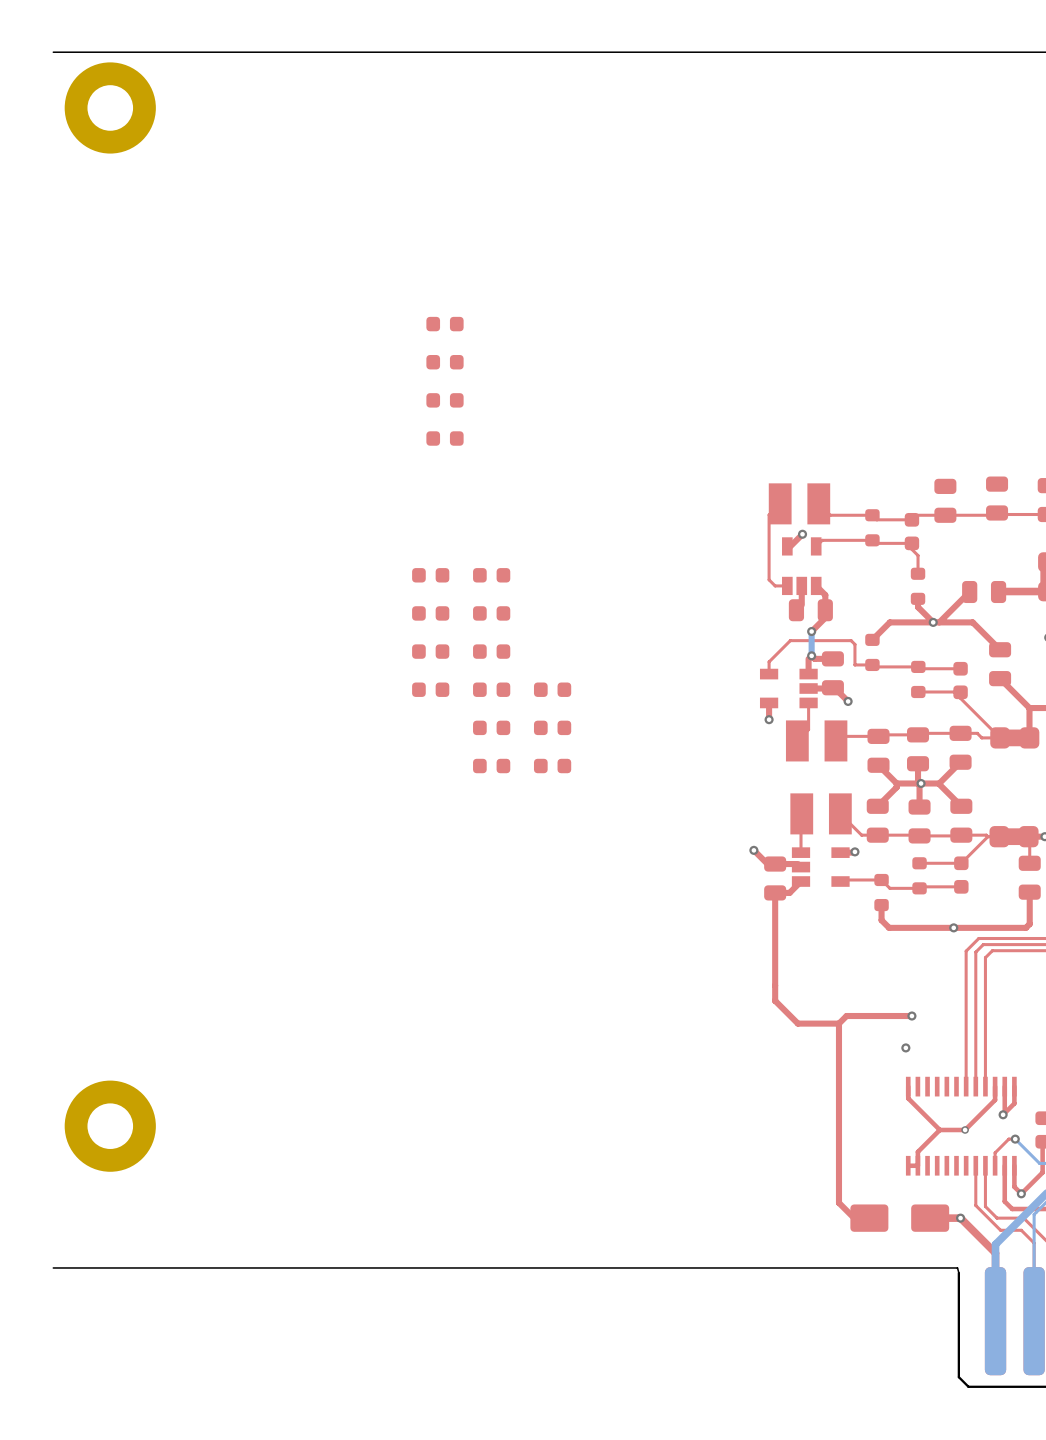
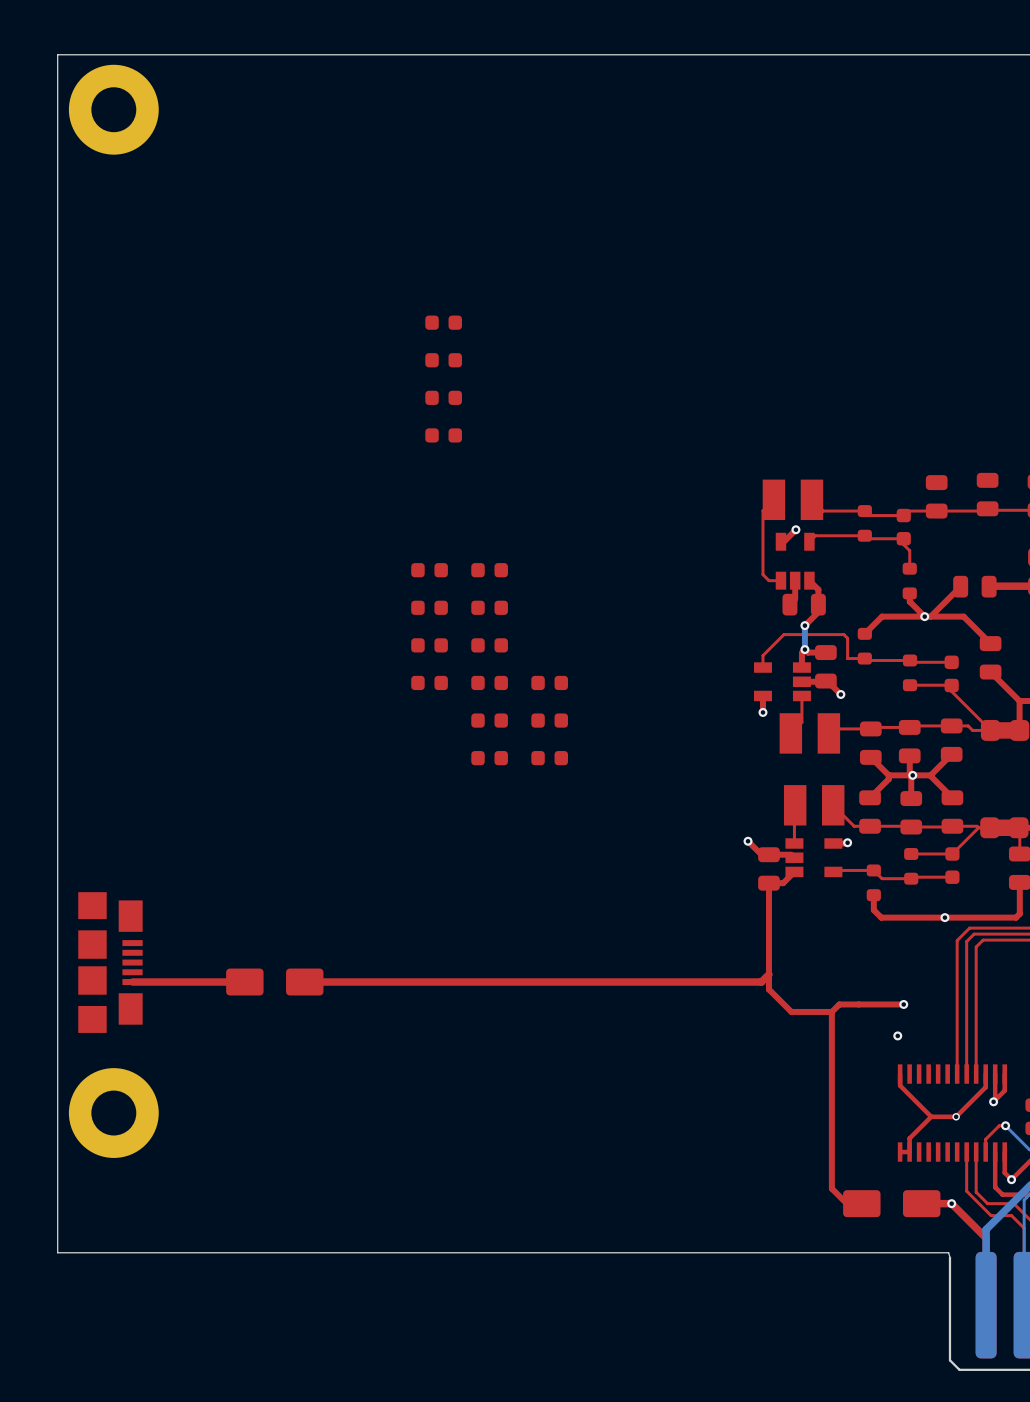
board edge: none -> (57, 54) (57, 1252)
part: none -> (110, 962)
top track: none -> (768, 974) (761, 982) (304, 982)
top track: none -> (244, 982) (132, 982)
part: none -> (274, 982)

